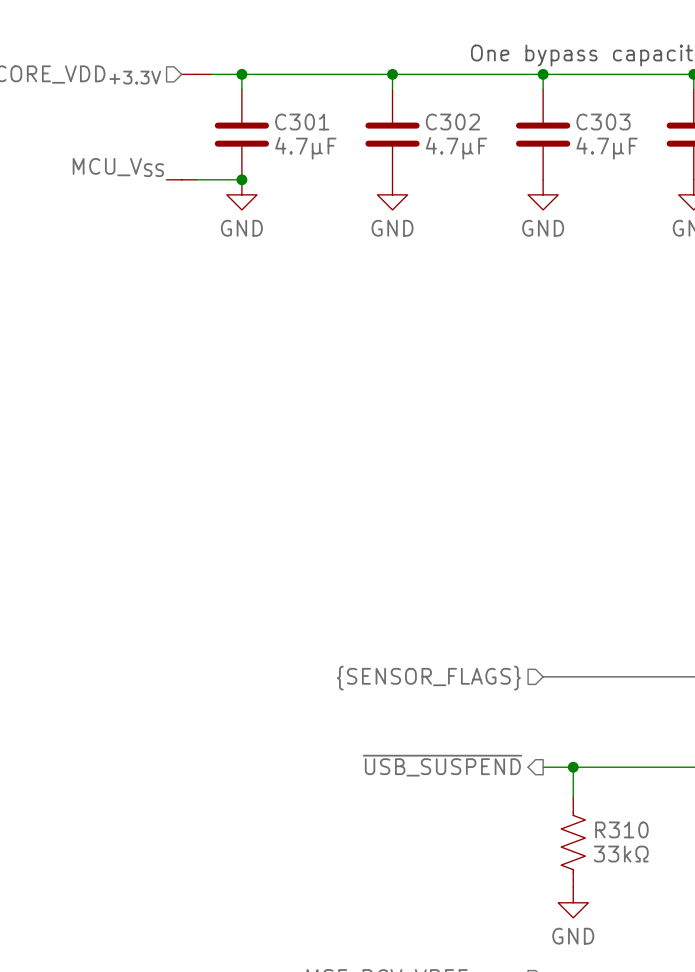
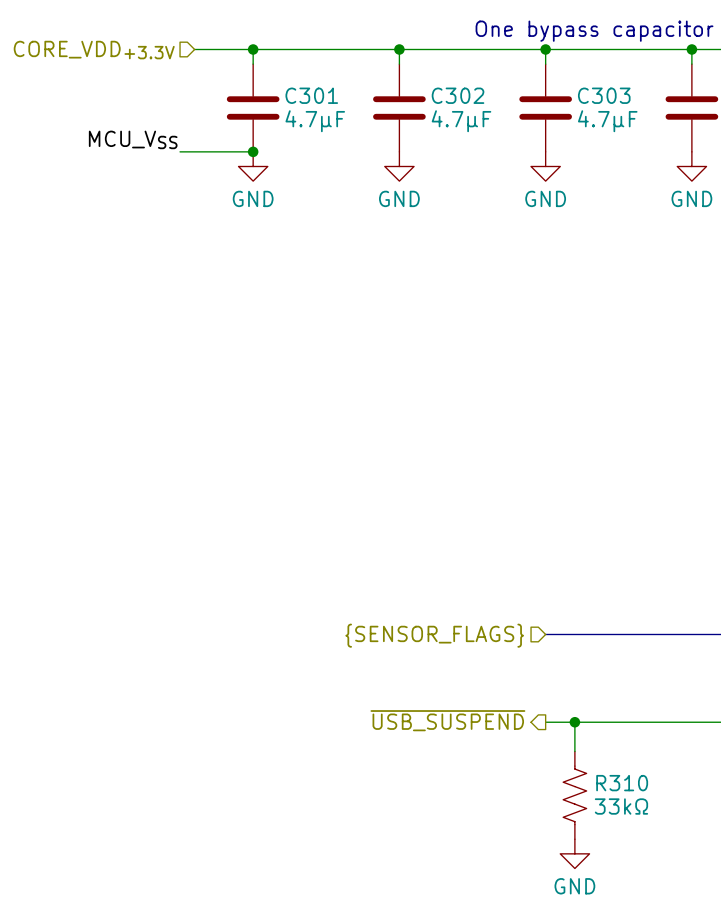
part: (196, 74) -> none
part: (181, 179) -> none

